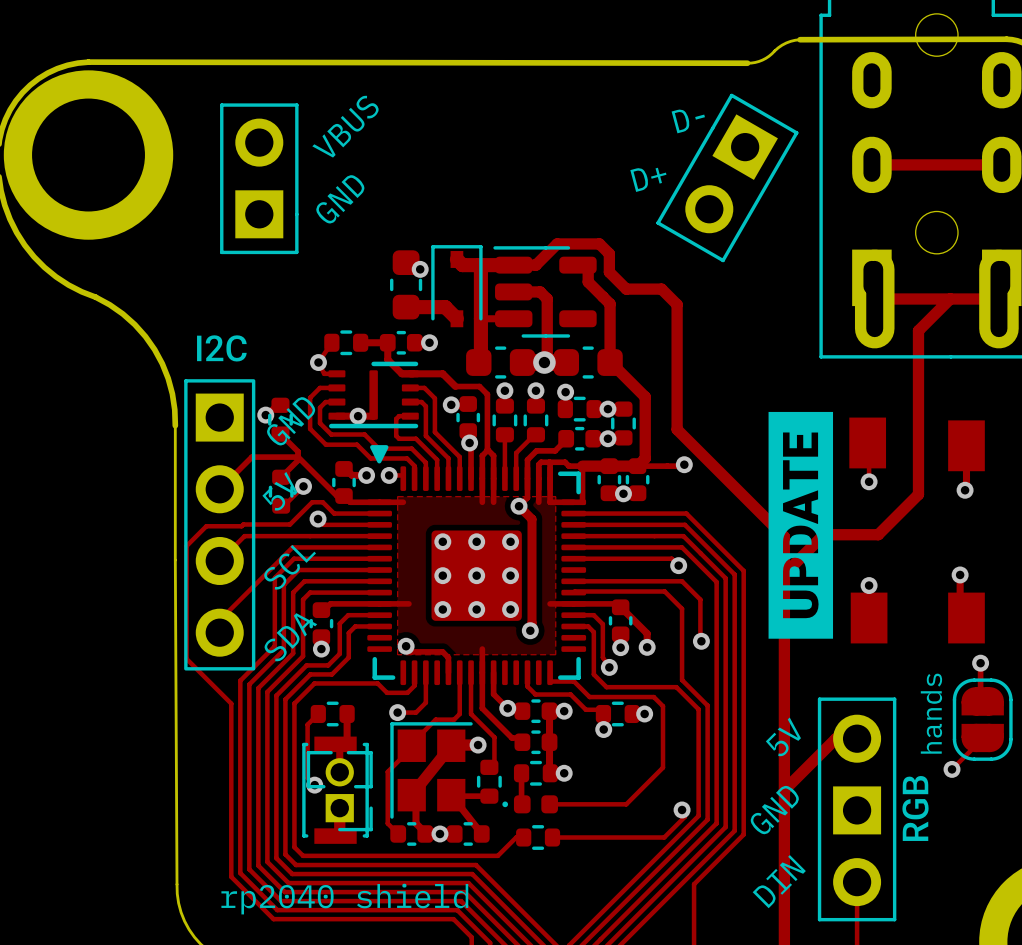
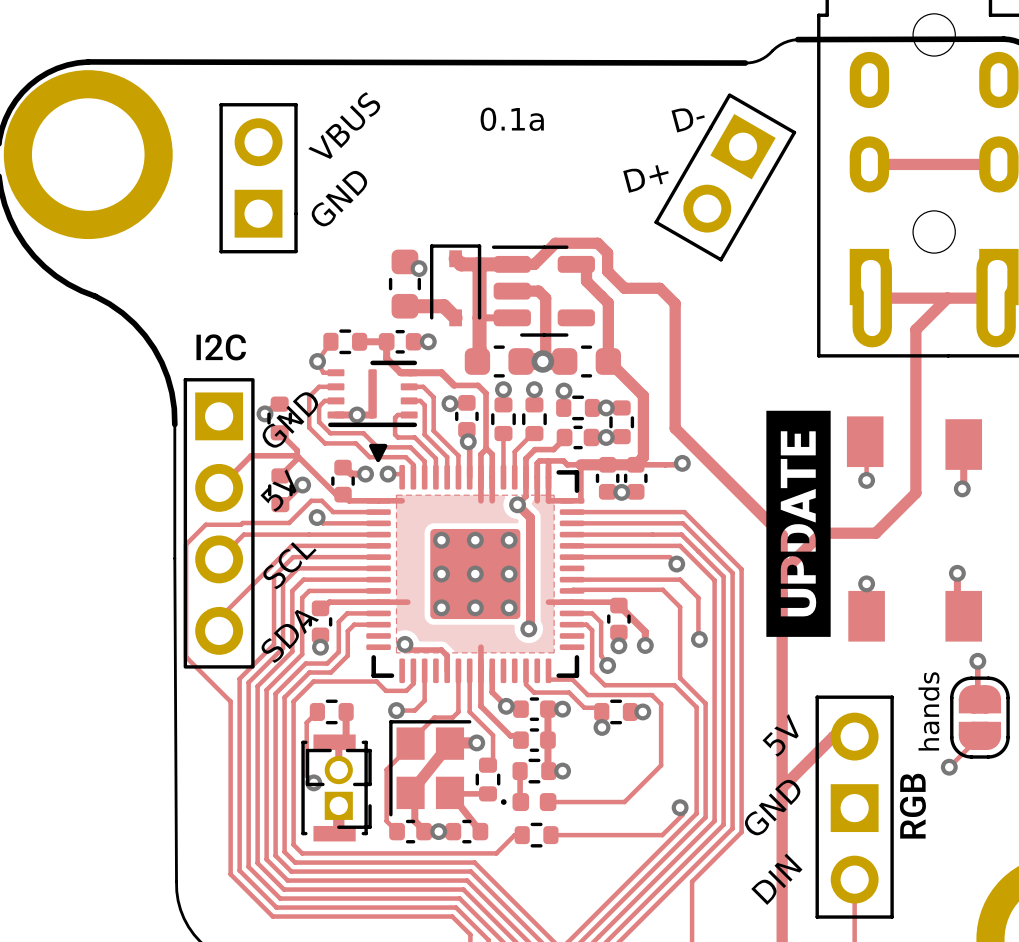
text: none -> 0.1a (512, 119)
text: rp2040 shield (344, 899) -> none

